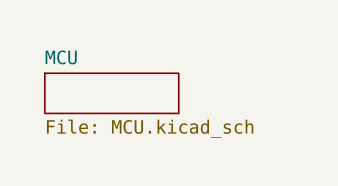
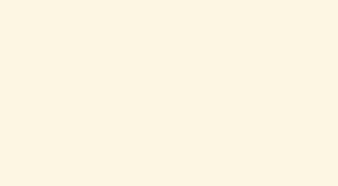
sheet MCU: File: MCU.kicad_sch (111, 93) -> none

